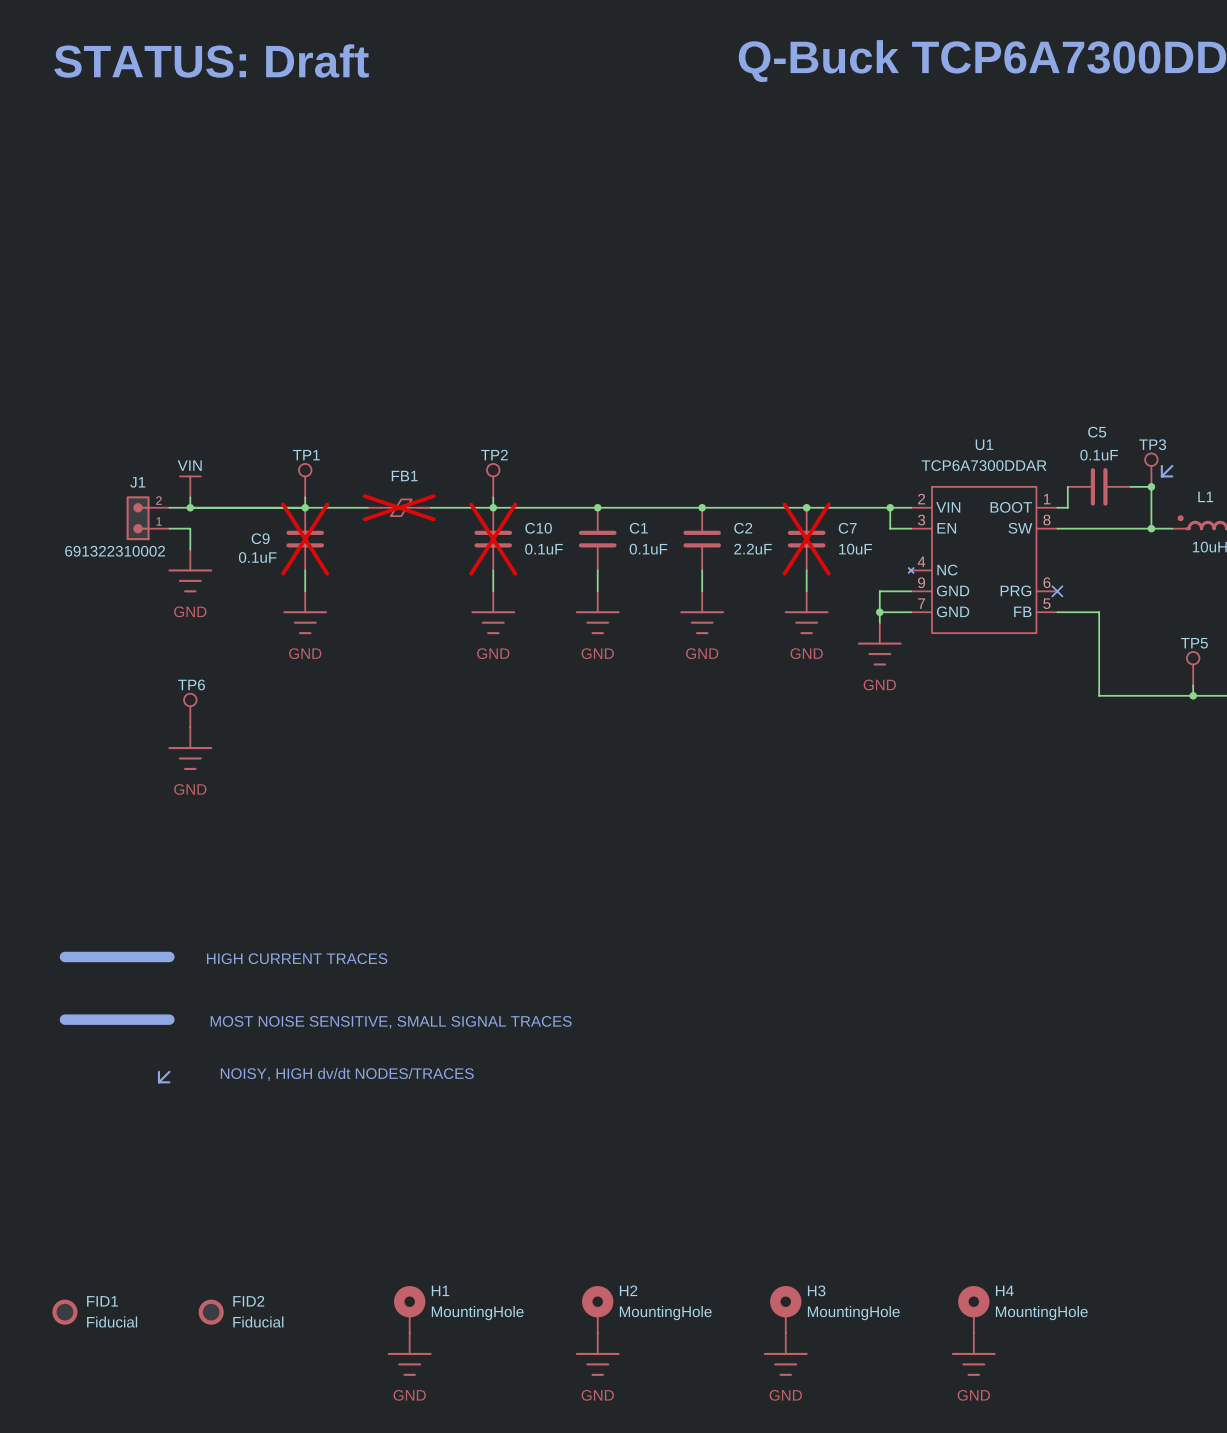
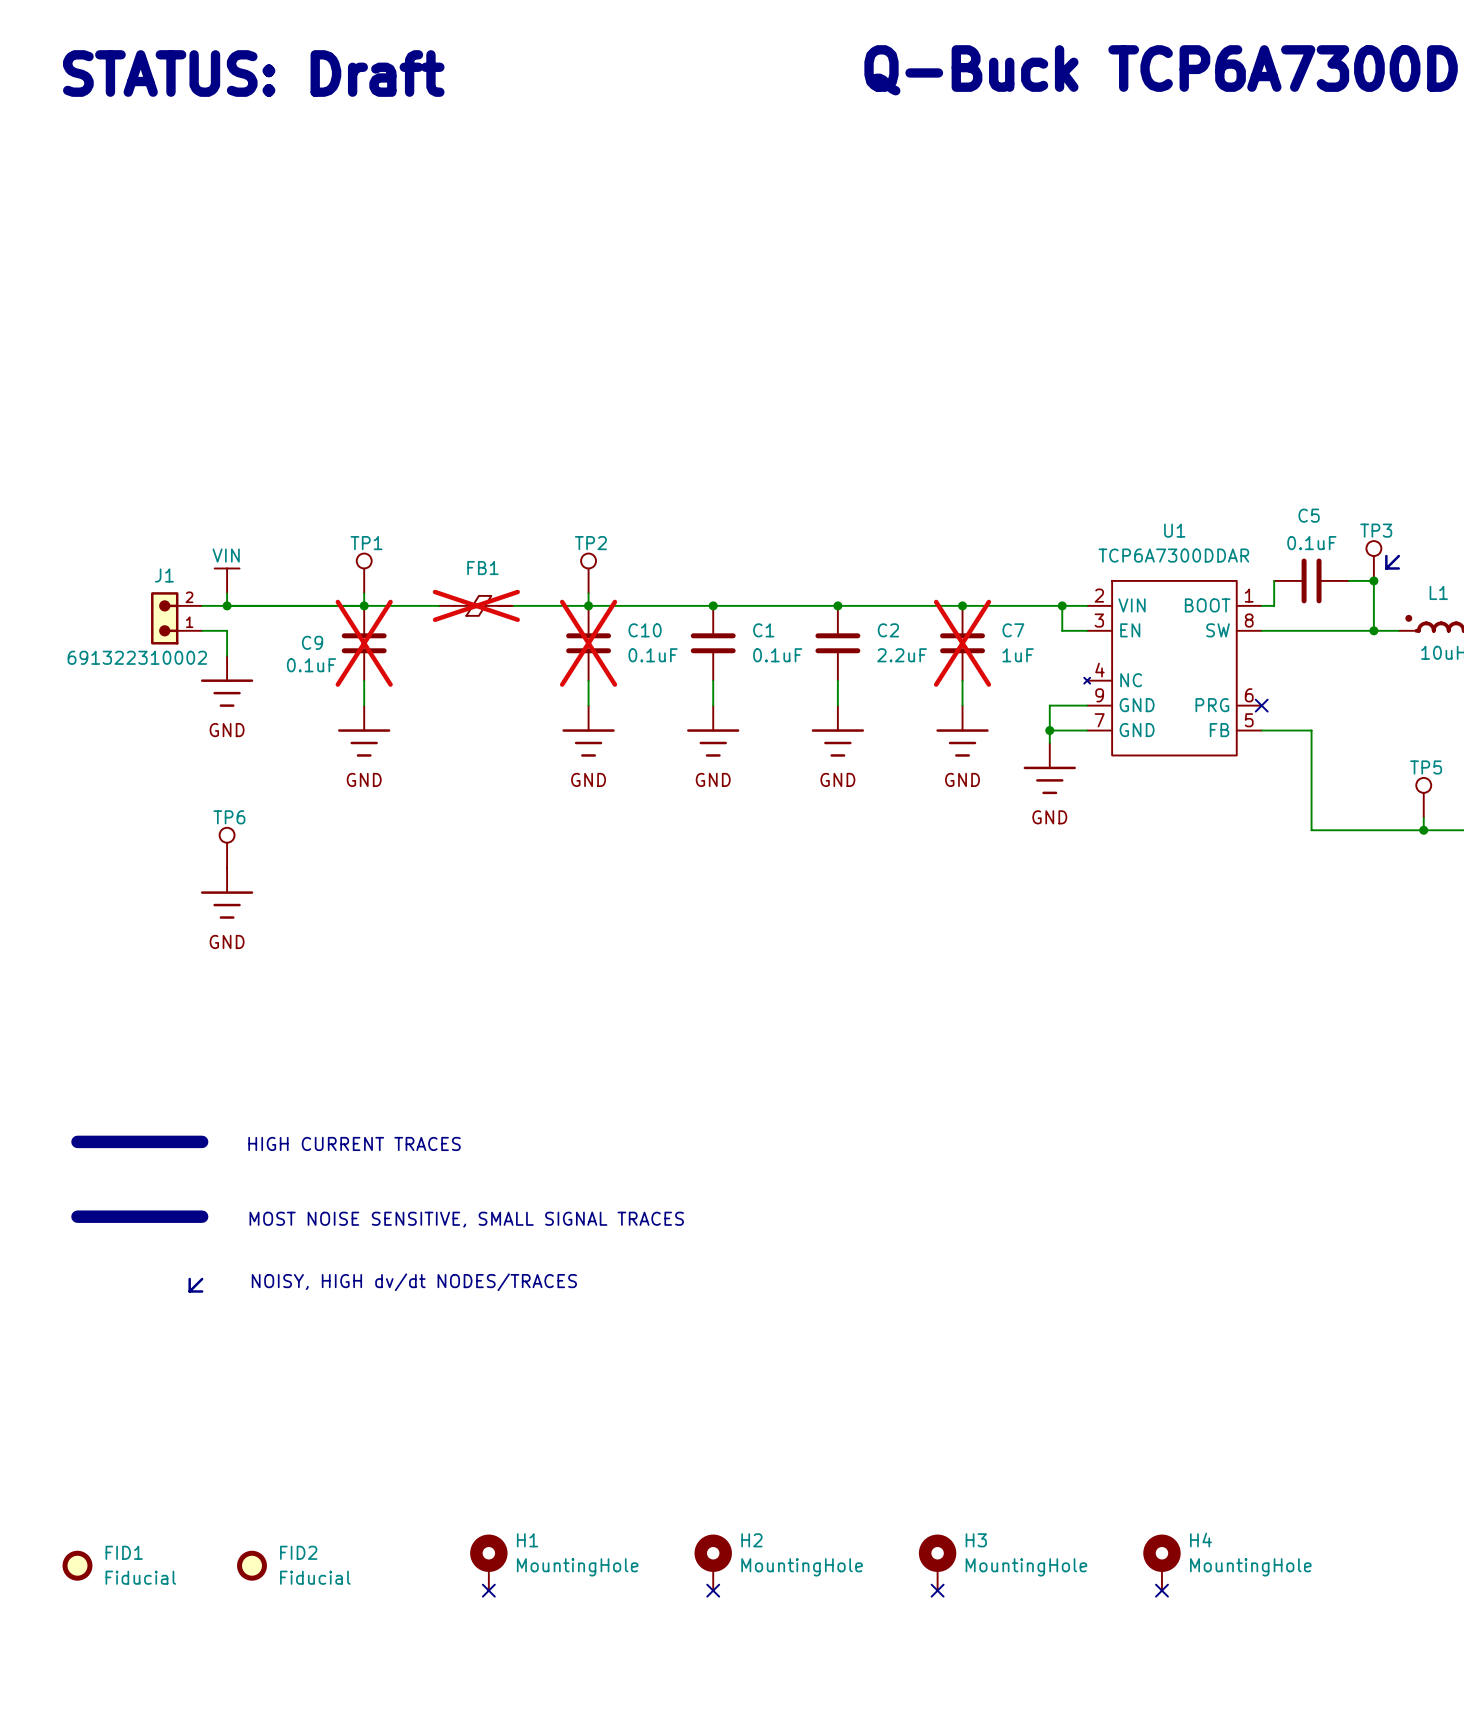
C7 value: 10uF (855, 549) -> 1uF (1018, 655)
no-connect mark: none -> (488, 1590)
no-connect mark: none -> (713, 1590)
no-connect mark: none -> (937, 1590)
no-connect mark: none -> (1161, 1590)
power symbol: (409, 1354) -> none
power symbol: (597, 1354) -> none
power symbol: (785, 1354) -> none
power symbol: (973, 1354) -> none

